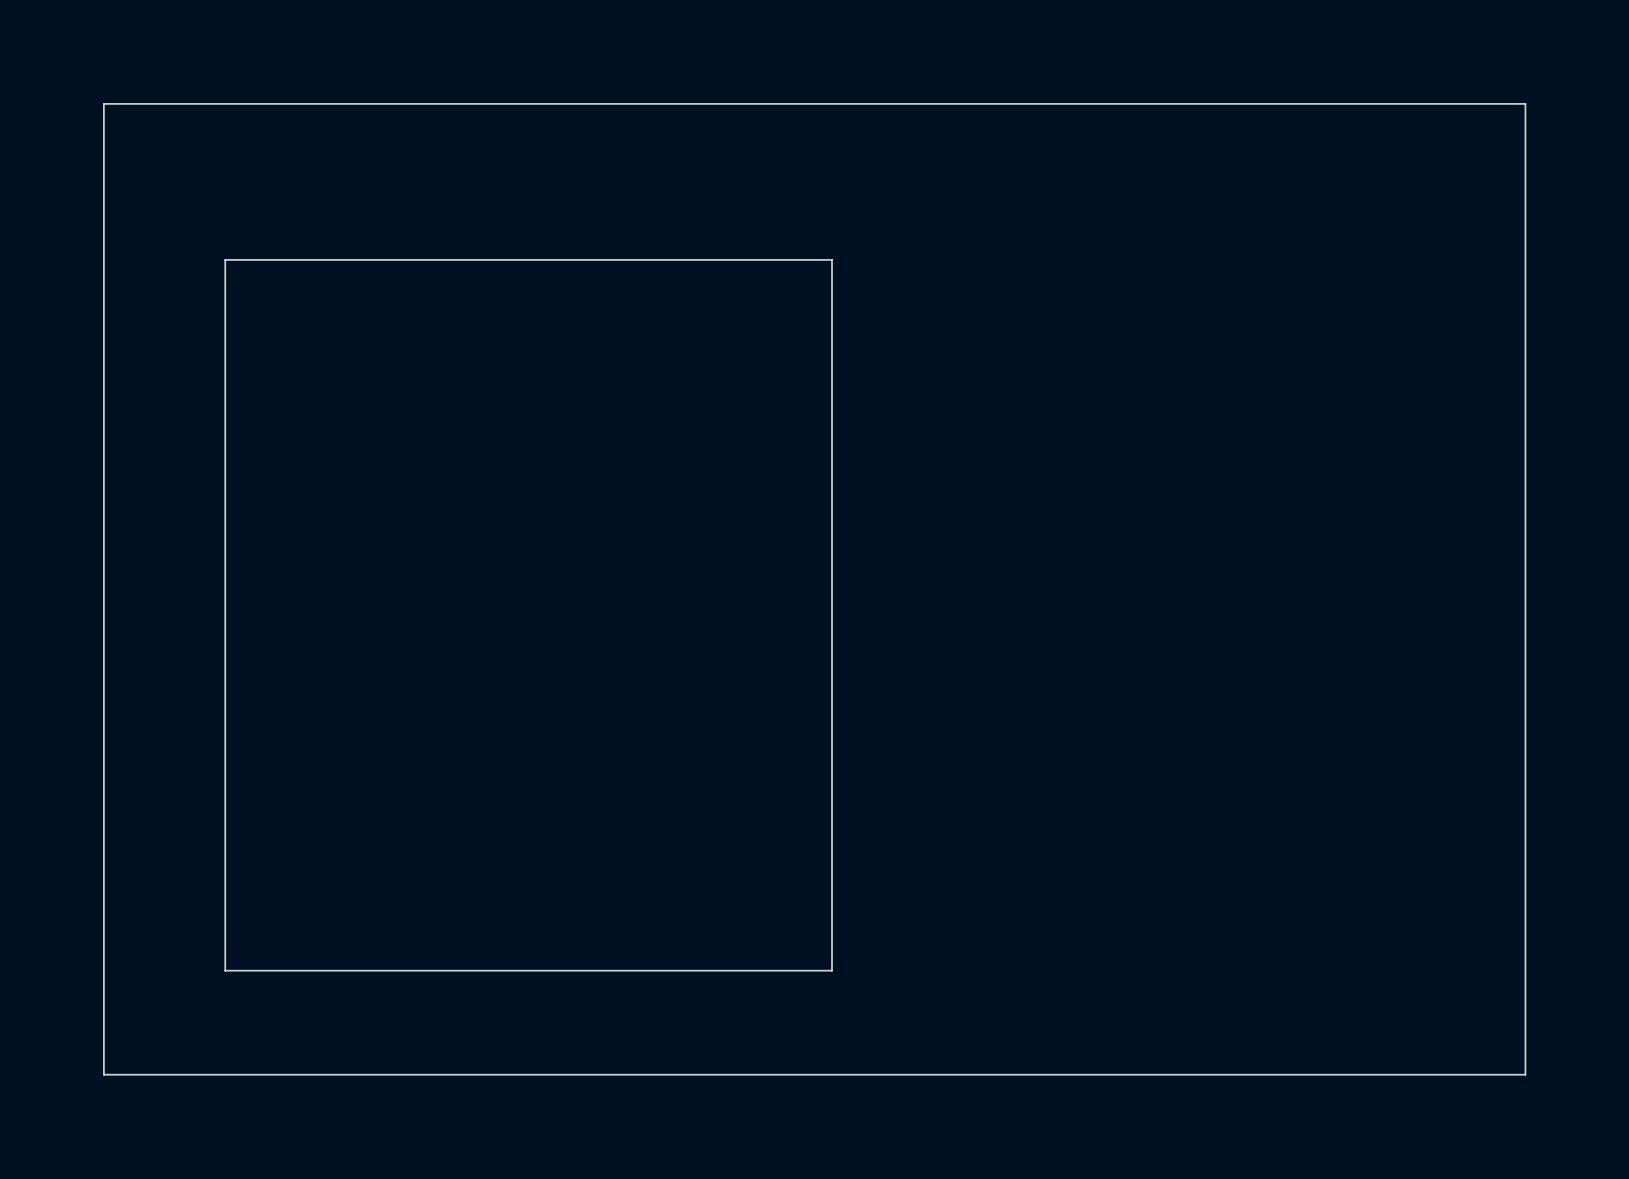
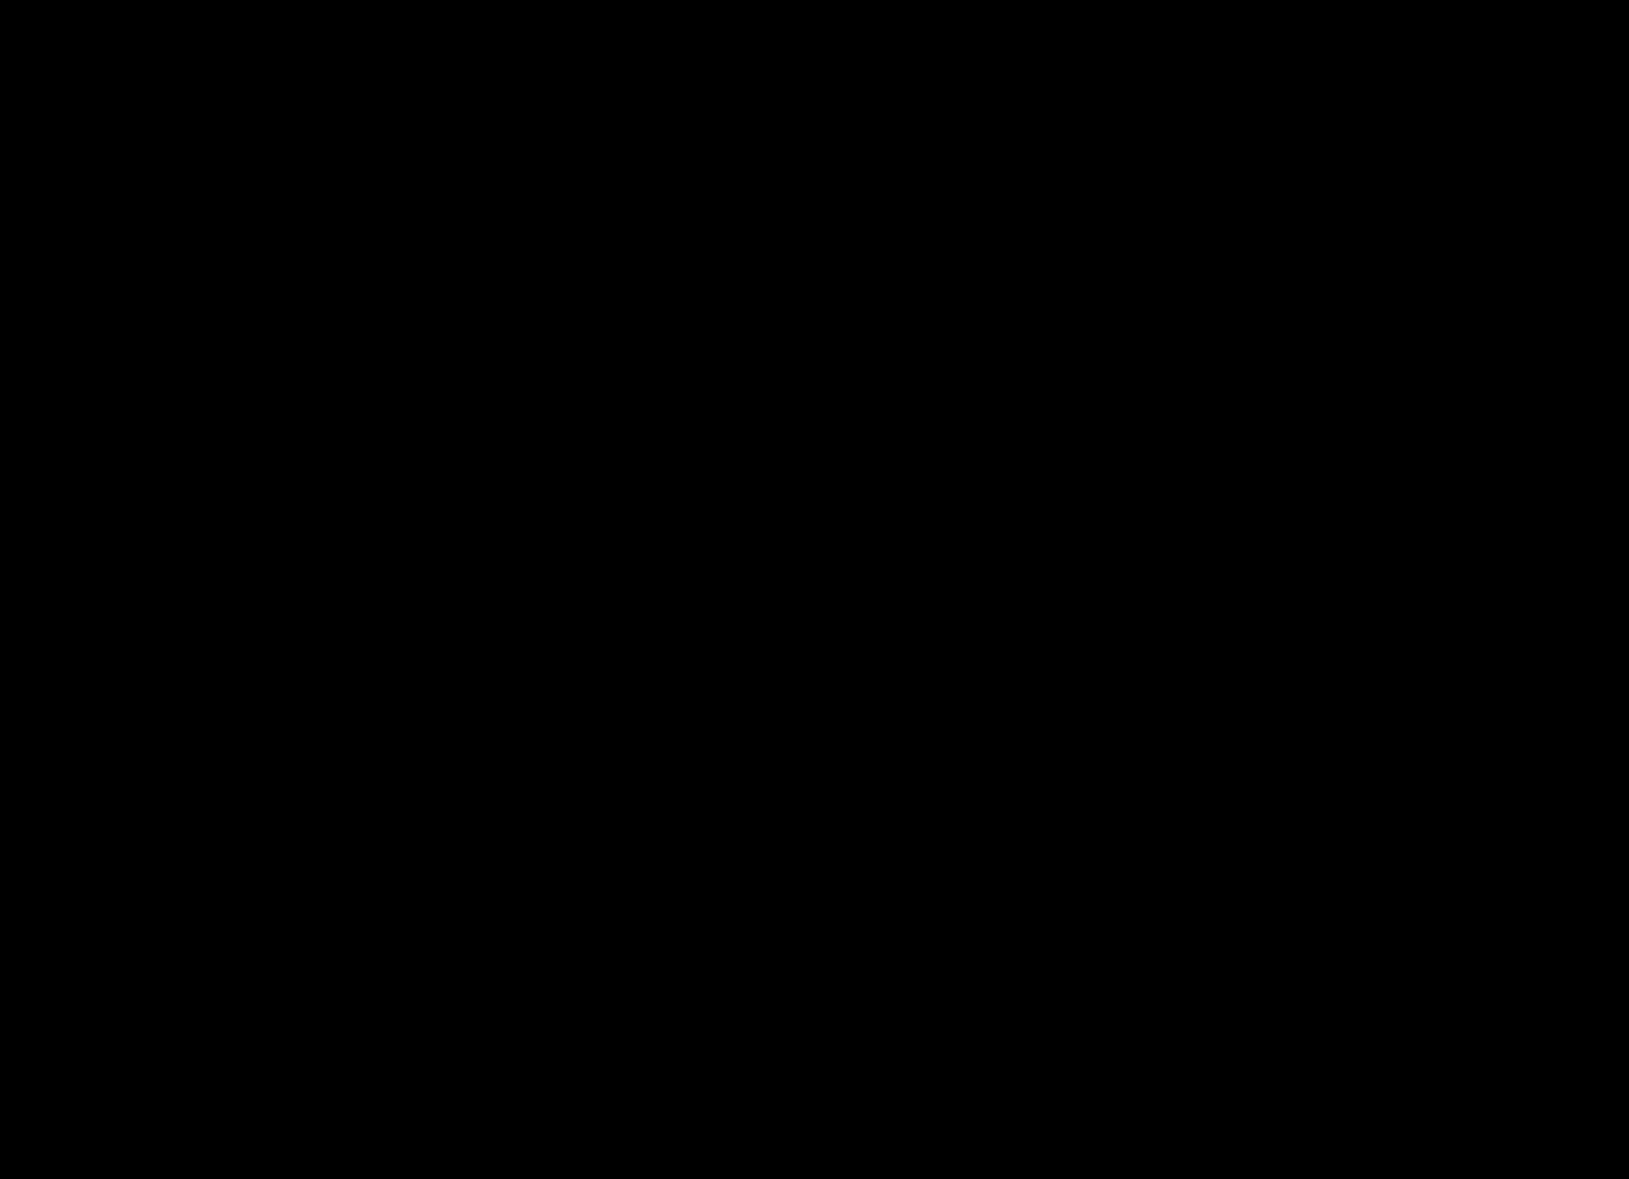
board edge: (1525, 103) (103, 103) (103, 1074) (1525, 1074) (1525, 103) -> none
board edge: (832, 259) (225, 259) (225, 970) (832, 970) (832, 259) -> none

